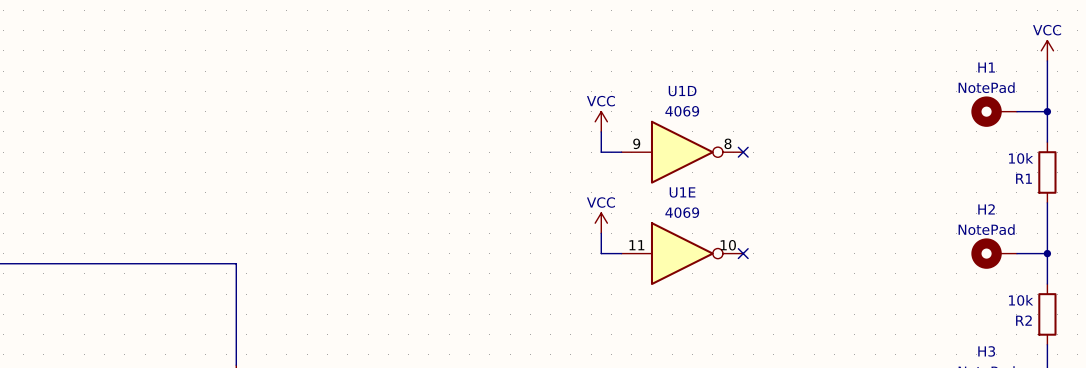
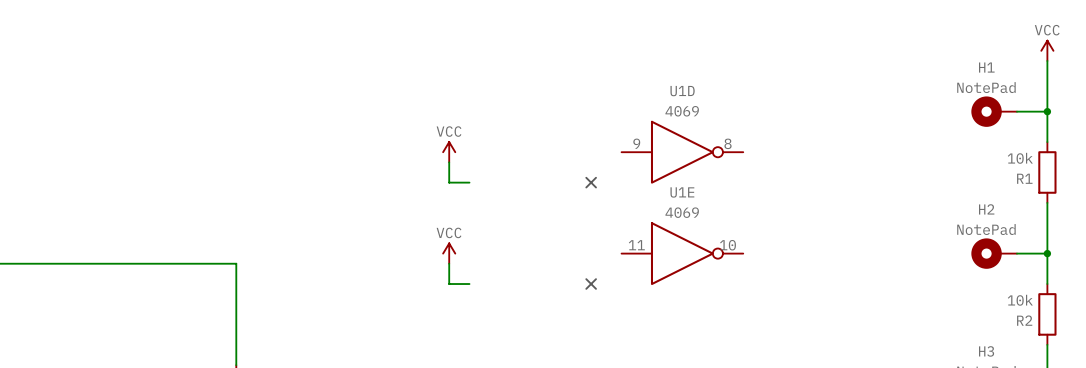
power symbol: VCC (601, 121) -> none
wire: (601, 131) (601, 152) (621, 152) -> (449, 162) (449, 182) (469, 182)
power symbol: none -> VCC (449, 152)
no-connect mark: (743, 152) -> none
no-connect mark: none -> (591, 182)
power symbol: VCC (601, 223) -> none
wire: (601, 233) (601, 253) (621, 253) -> (449, 263) (449, 284) (469, 284)
power symbol: none -> VCC (449, 253)
no-connect mark: (743, 253) -> none
no-connect mark: none -> (591, 284)

